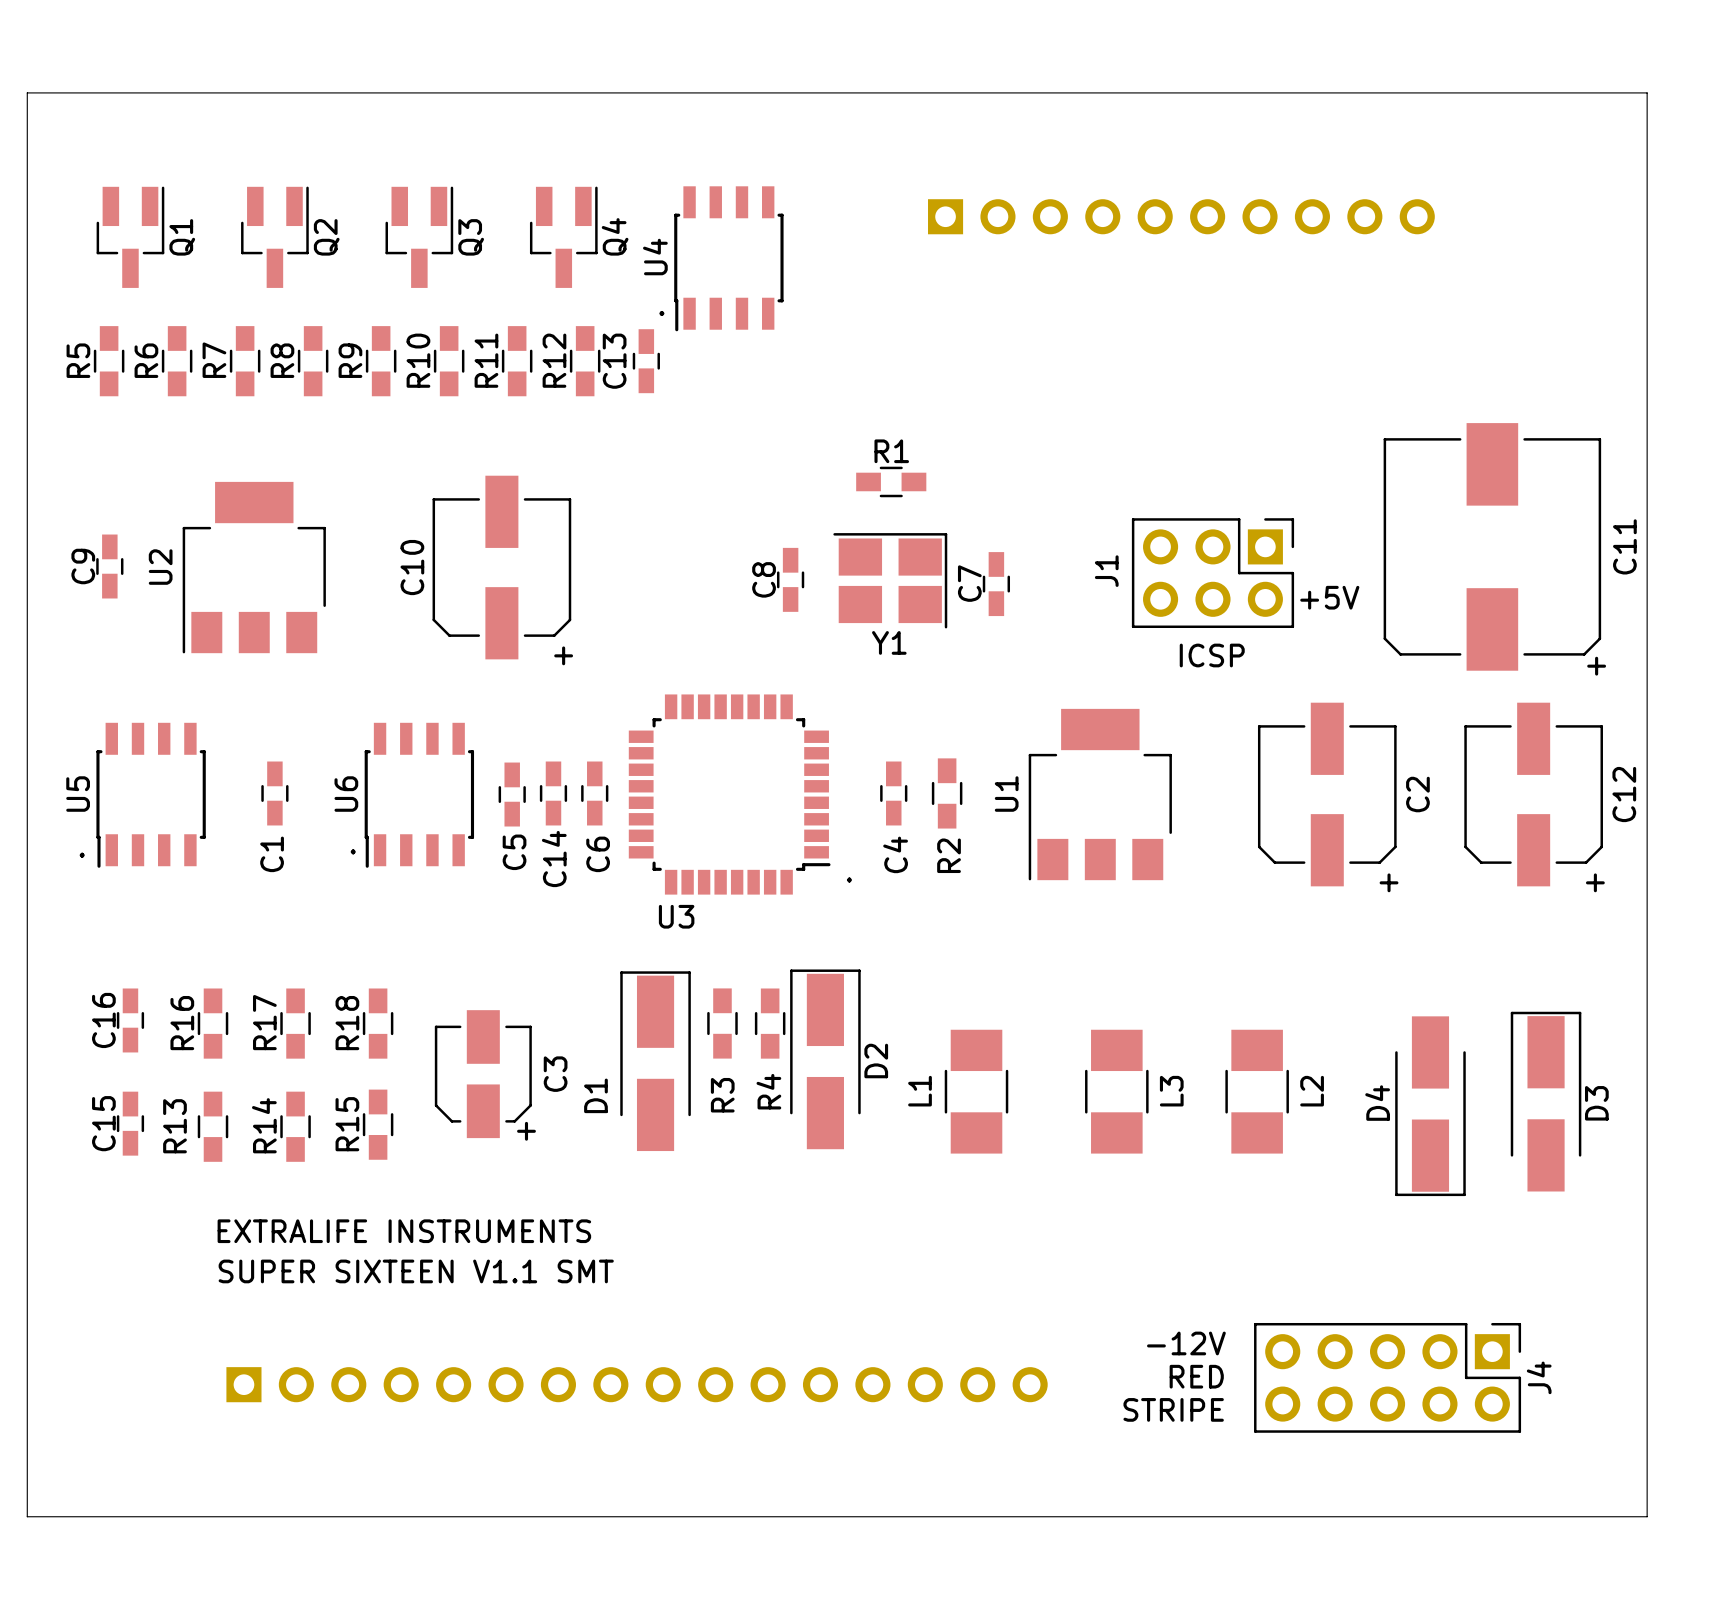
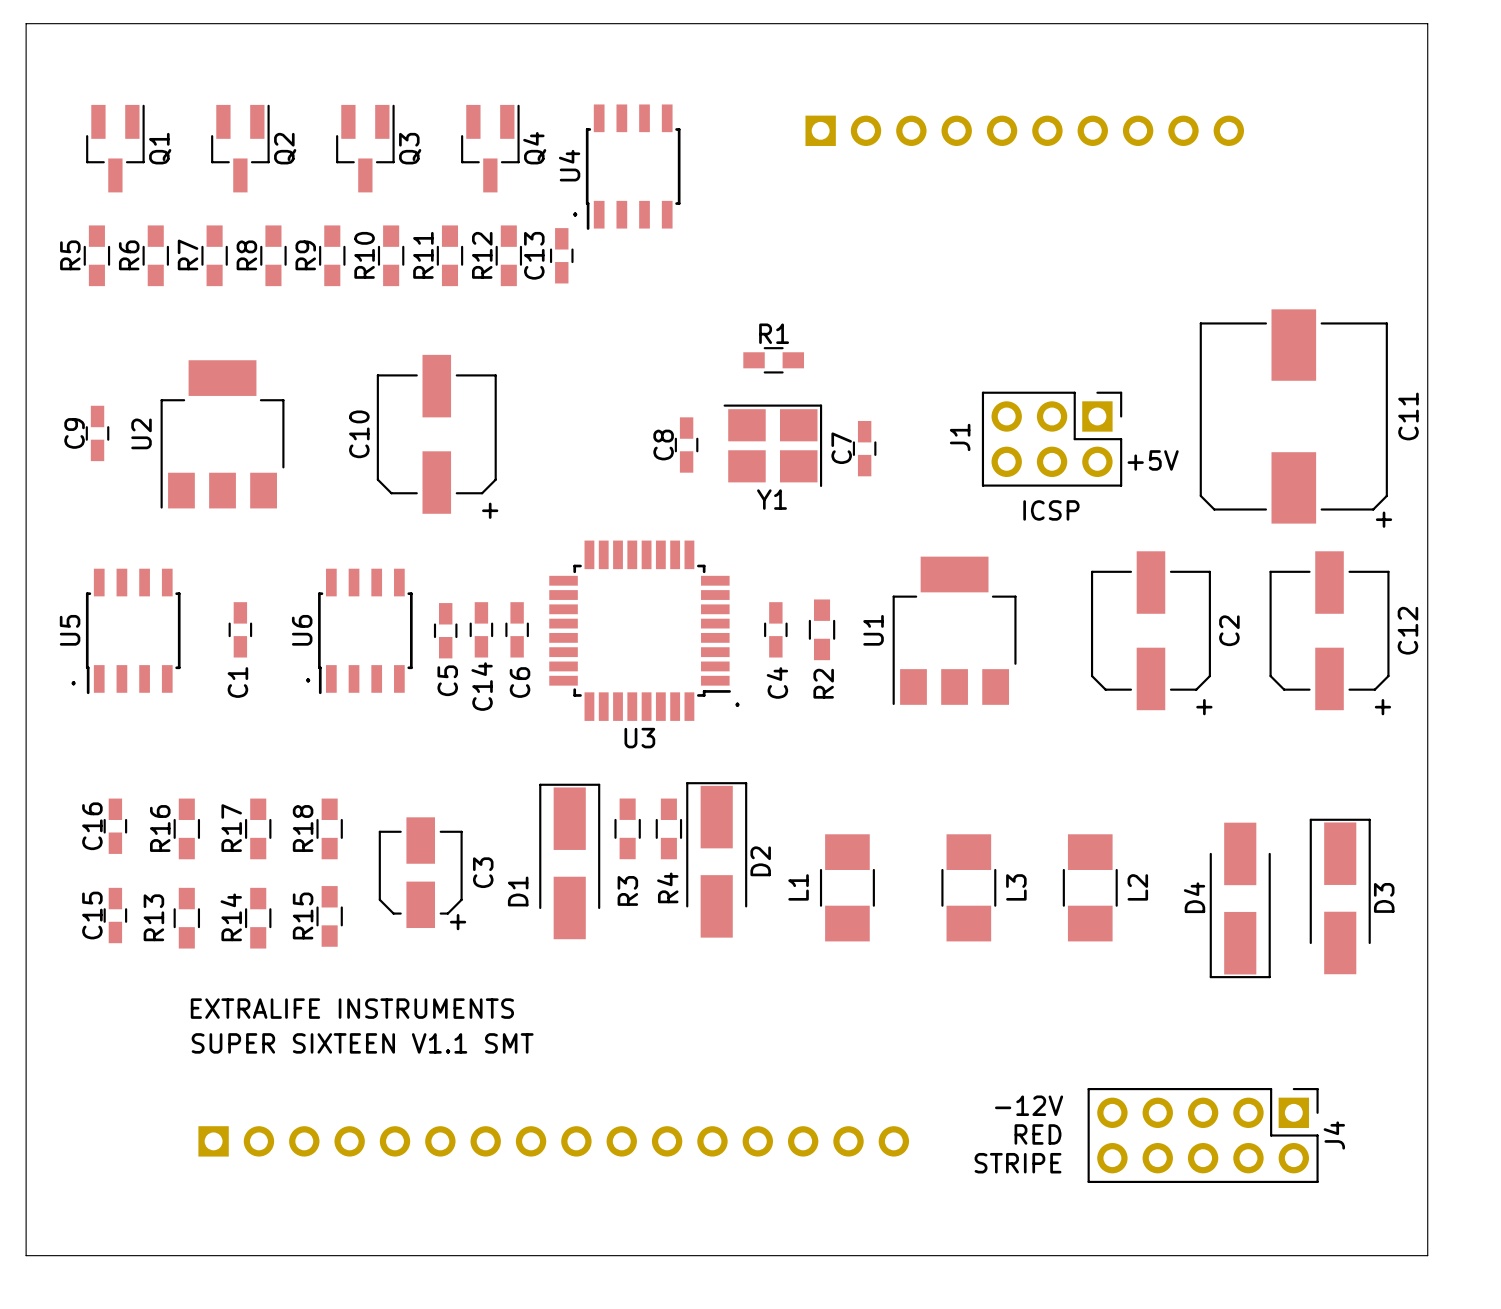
U3 footprint: [628, 694, 831, 895] -> [549, 540, 731, 721]
U3 name position: U3 (676, 916) -> U3 (639, 738)

